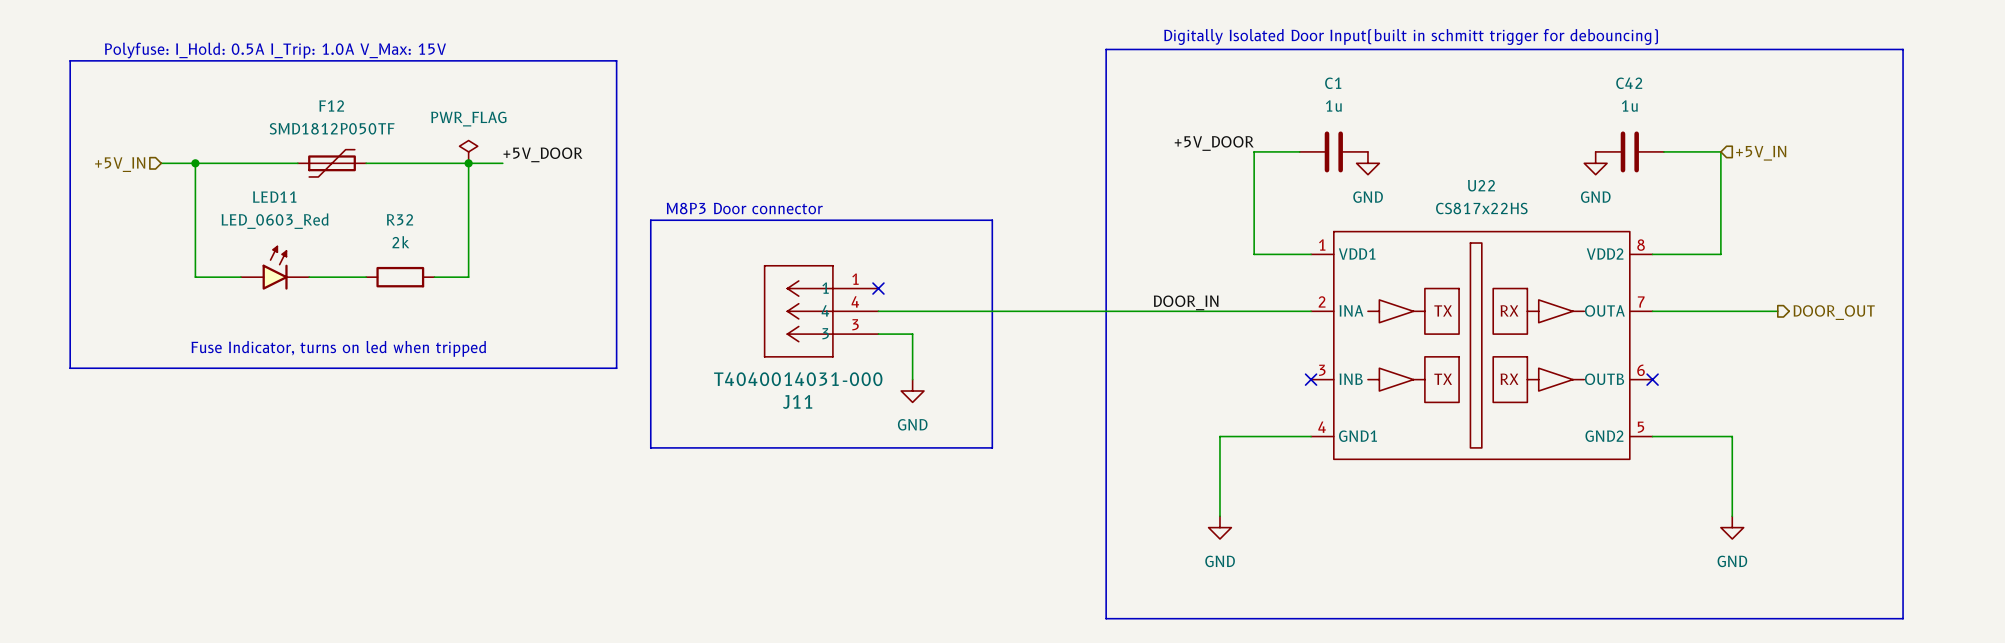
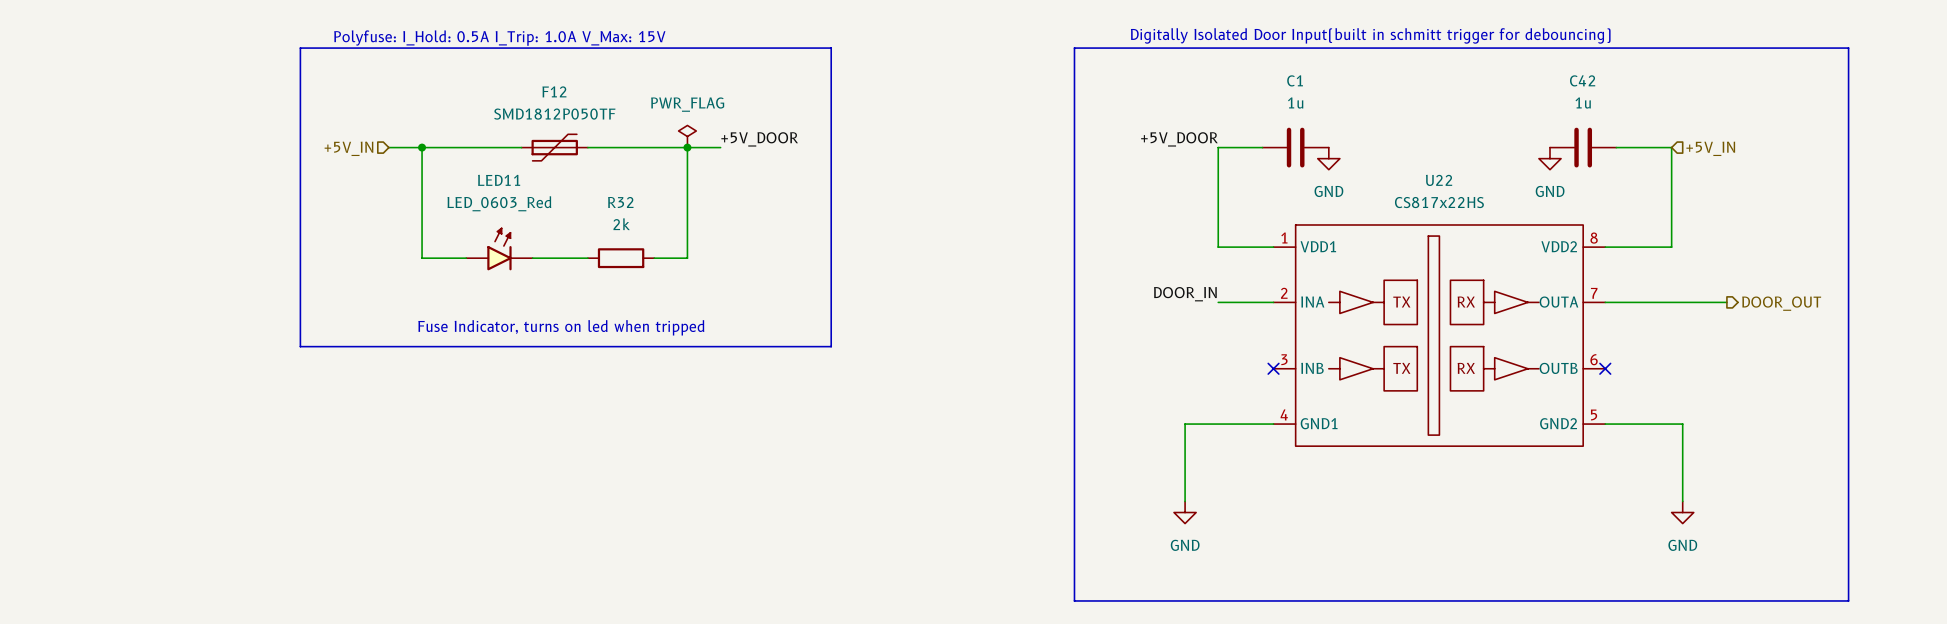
text: none -> Polyfuse: I_Hold: 0.5A I_Trip: 1.0A V_Max: 15V (499, 38)
line: none -> (300, 48) (831, 48) (831, 346) (300, 346) (300, 48)
text: Polyfuse: I_Hold: 0.5A I_Trip: 1.0A V_Max: 15V (275, 50) -> none
line: (70, 60) (616, 60) (616, 368) (70, 368) (70, 60) -> none
power symbol: none -> PWR_FLAG (687, 136)
label: none -> +5V_DOOR (759, 139)
wire: none -> (422, 147) (422, 258) (466, 258)
power symbol: PWR_FLAG (468, 151) -> none
wire: none -> (587, 147) (720, 147)
wire: none -> (687, 147) (687, 258) (654, 258)
junction: none -> (687, 147)
hierarchical label: none -> +5V_IN (348, 148)
label: +5V_DOOR (542, 154) -> none
wire: (161, 163) (297, 163) -> none
wire: (195, 163) (195, 277) (240, 277) -> none
junction: (195, 163) -> none
F12 position: (332, 163) -> (554, 147)
wire: (366, 163) (502, 163) -> (388, 147) (521, 147)
wire: (468, 163) (468, 277) (434, 277) -> none
junction position: (468, 163) -> (422, 147)
hierarchical label: +5V_IN (120, 164) -> none
text: M8P3 Door connector (744, 208) -> none
line: (650, 220) (992, 220) (992, 447) (650, 447) (650, 220) -> none
wire: none -> (532, 258) (587, 258)
LED11 position: (275, 267) -> (499, 248)
wire: (309, 277) (366, 277) -> none
R32 position: (400, 277) -> (621, 258)
no-connect mark: (878, 288) -> none
label position: DOOR_IN (1186, 302) -> DOOR_IN (1185, 294)
J11: T4040014031-000 (821, 311) -> none
wire: (878, 311) (1254, 311) -> none
wire: (878, 334) (912, 334) (912, 379) -> none
text: none -> Fuse Indicator, turns on led when tripped (561, 327)
text: Fuse Indicator, turns on led when tripped (338, 348) -> none
power symbol: GND (912, 391) -> none

